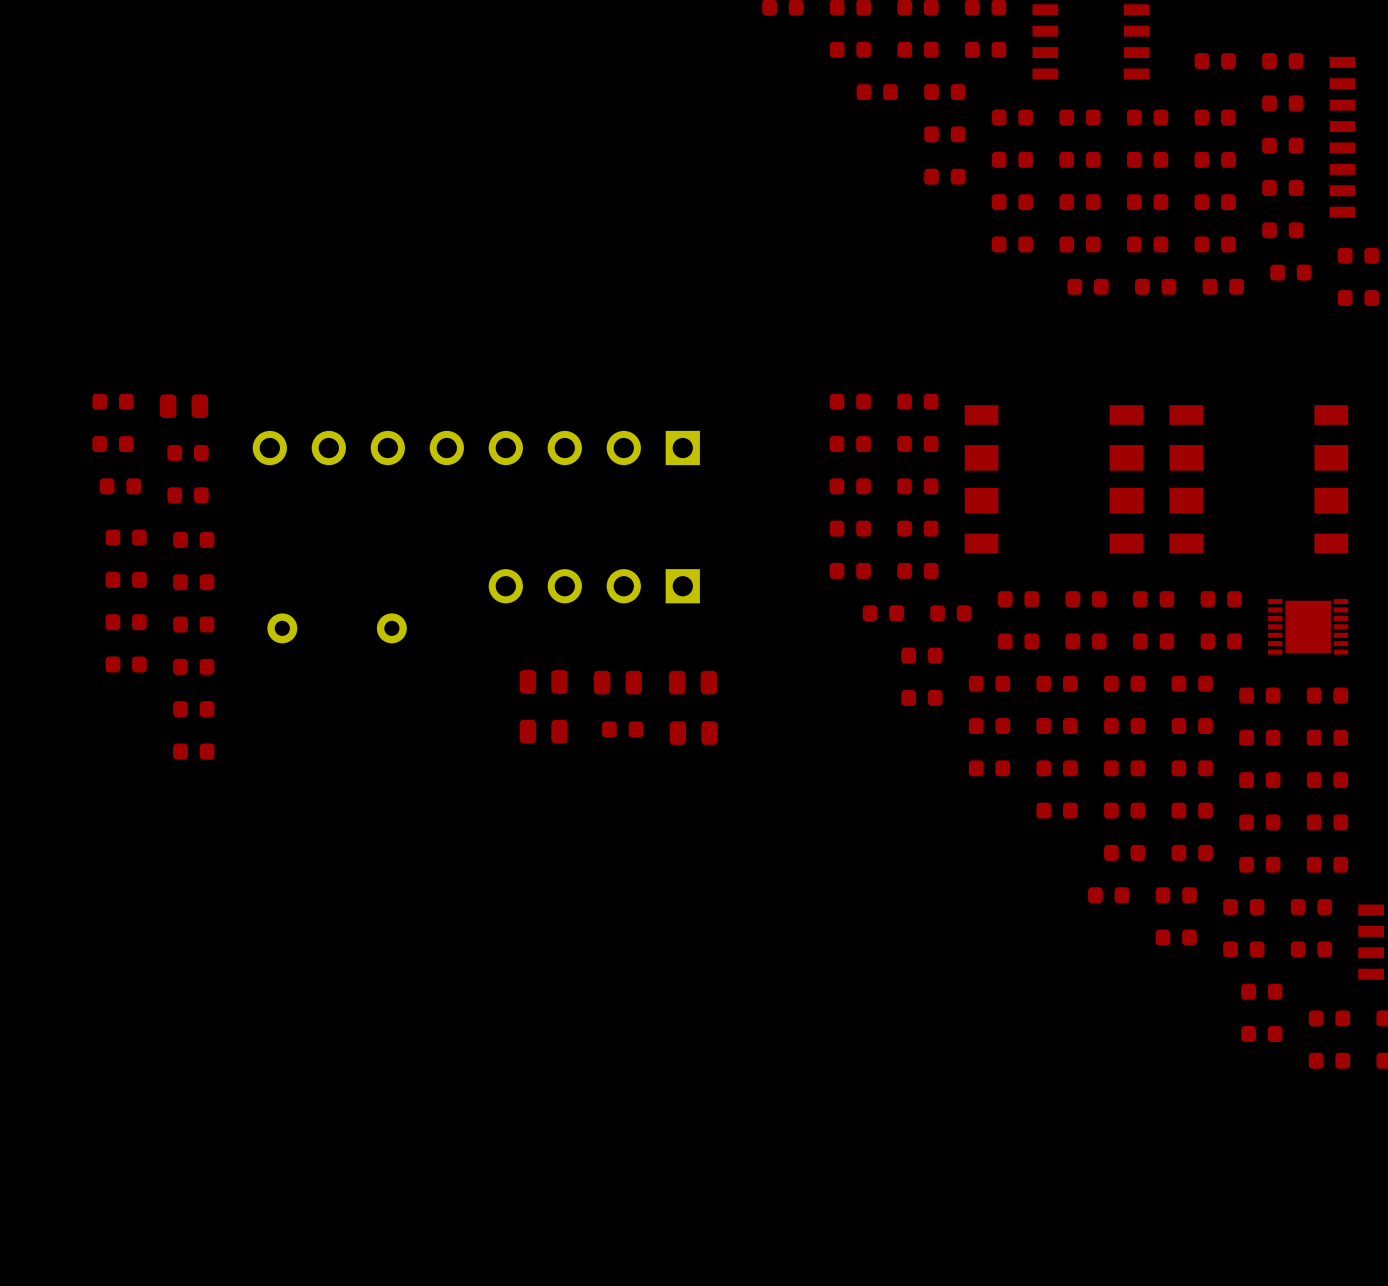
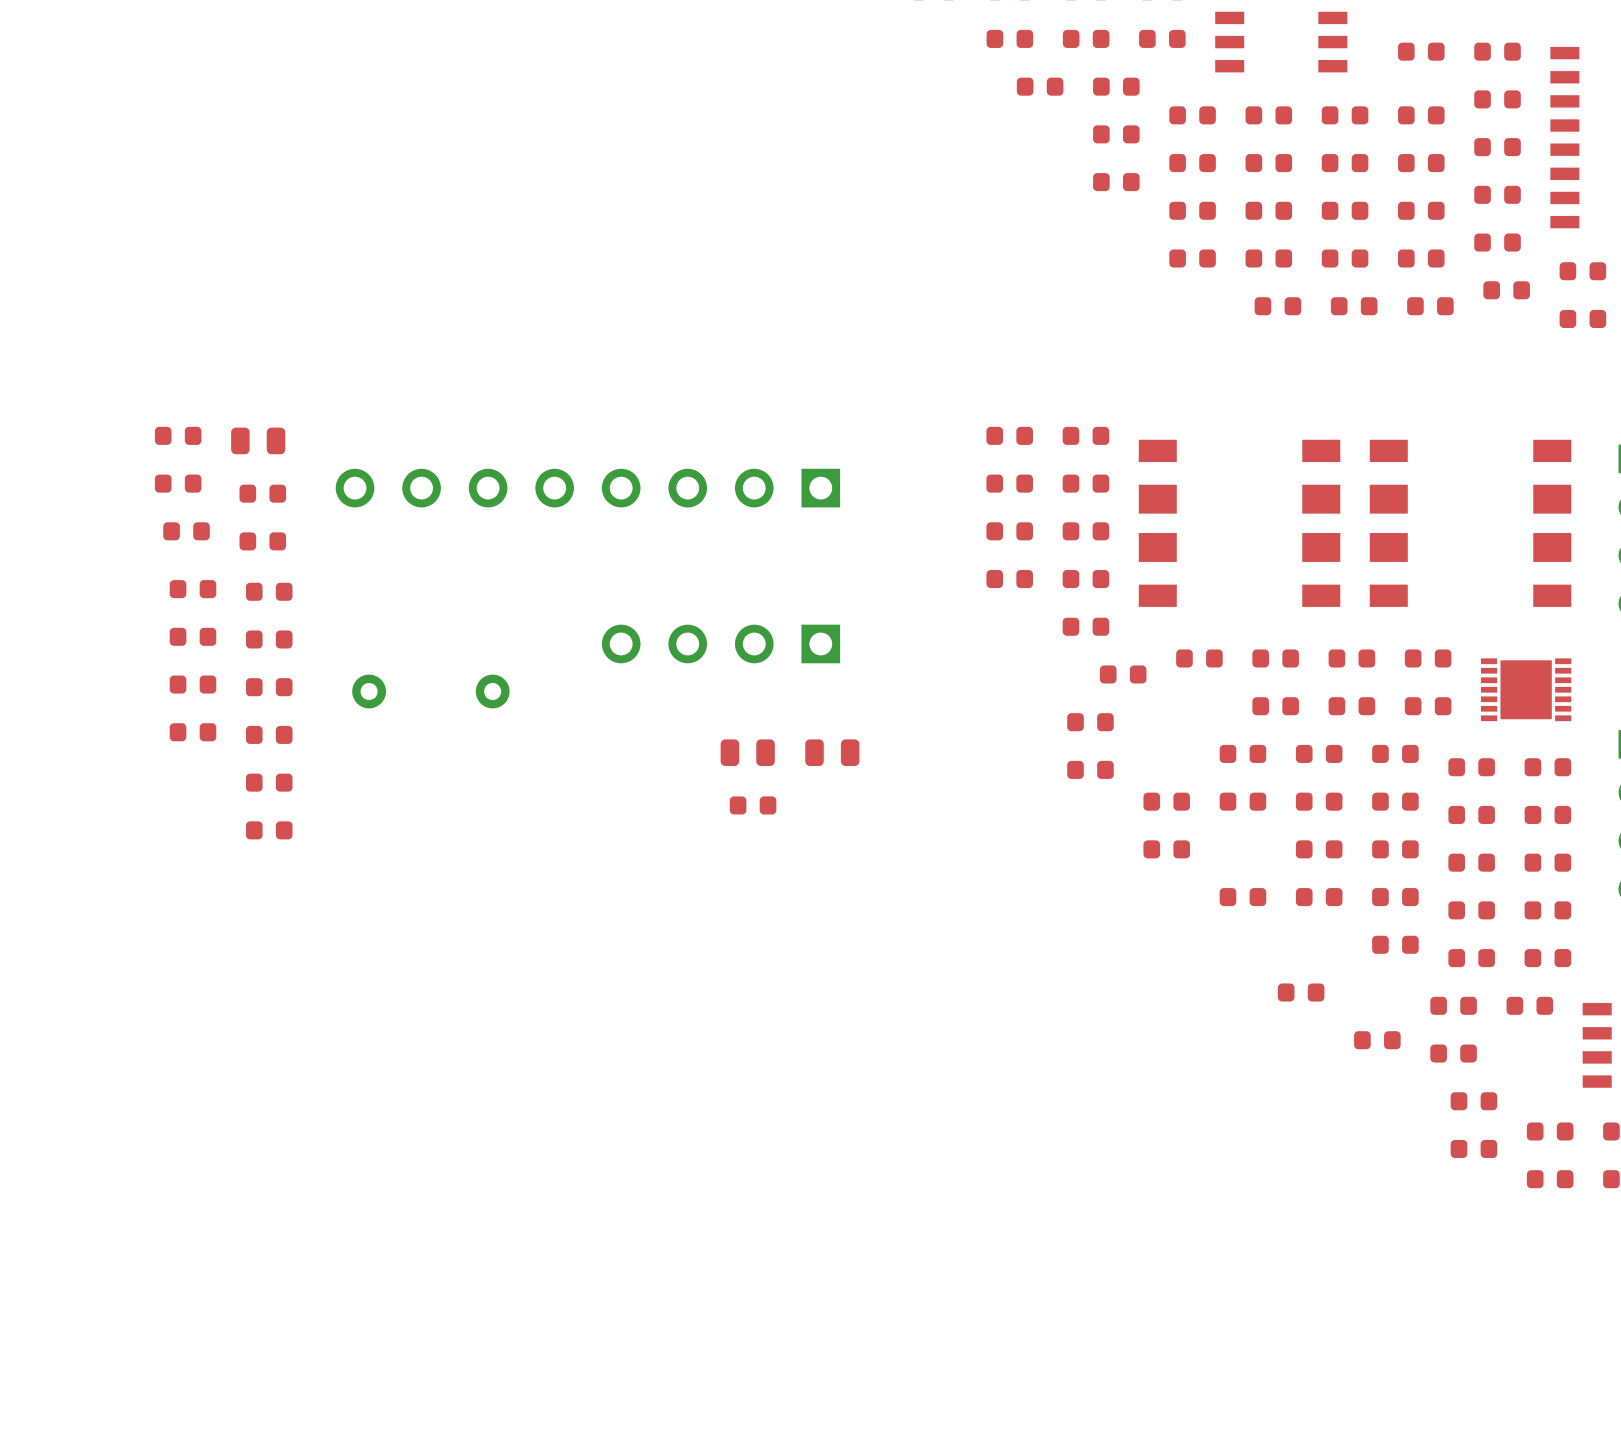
part: (850, 570) -> none
part: (883, 613) -> none
part: (1018, 641) -> none
part: (543, 681) -> none
part: (989, 683) -> none
part: (543, 731) -> none
part: (693, 733) -> none
part: (1057, 768) -> none
part: (1124, 852) -> none
part: (1176, 895) -> none
part: (1311, 949) -> none

